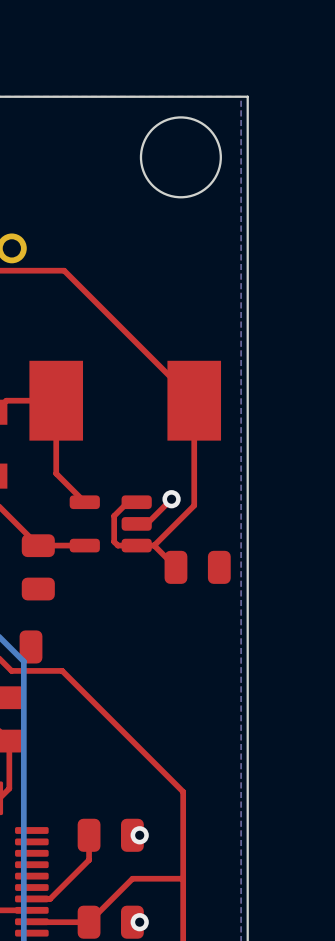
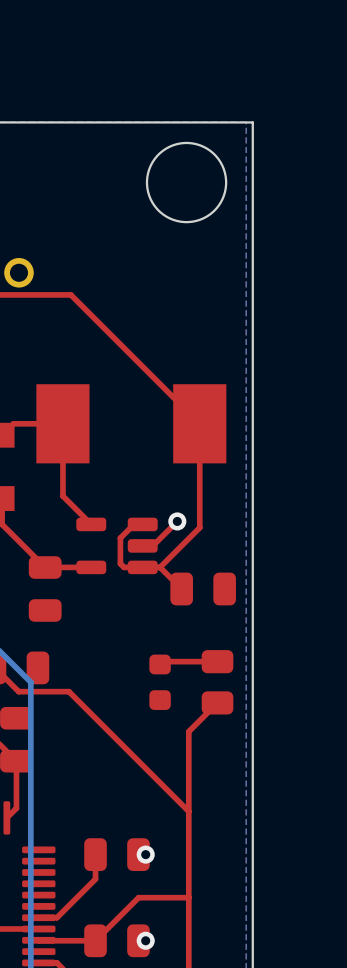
top track: none -> (217, 661) (162, 661) (160, 664)
part: none -> (160, 682)
part: none -> (217, 682)
top track: none -> (217, 702) (188, 731) (188, 811)

